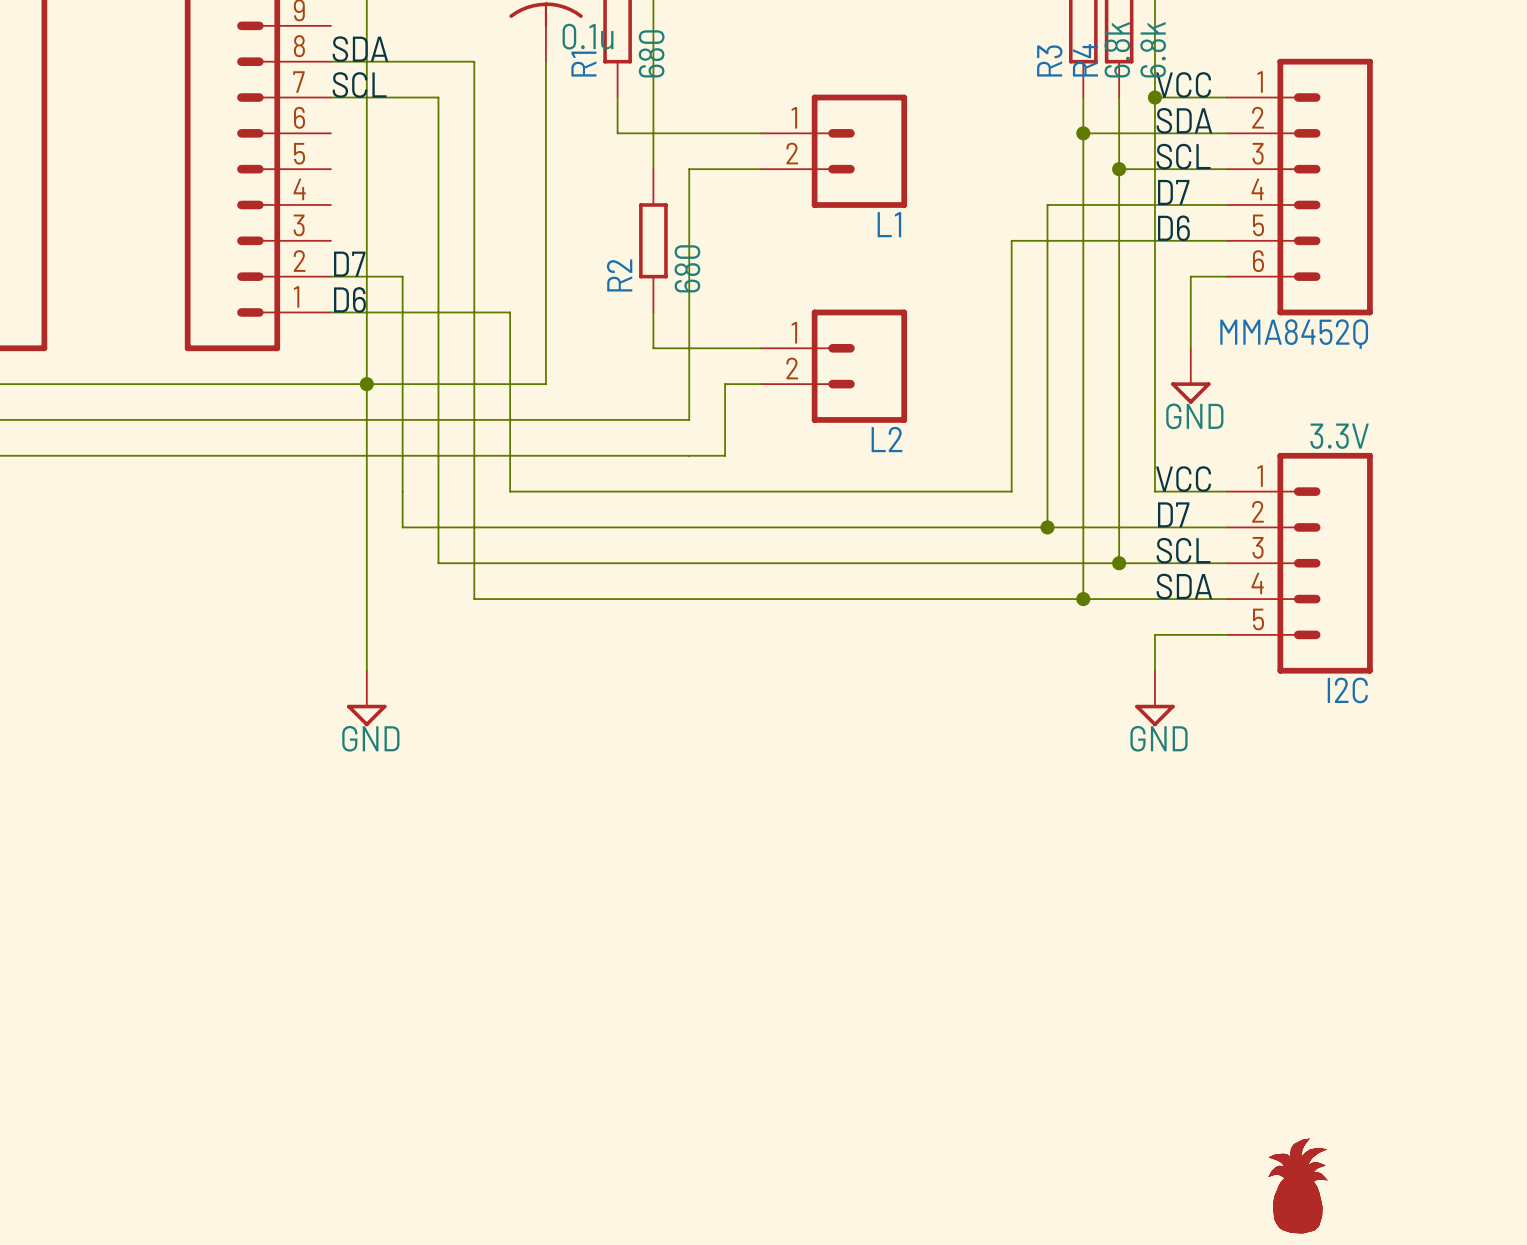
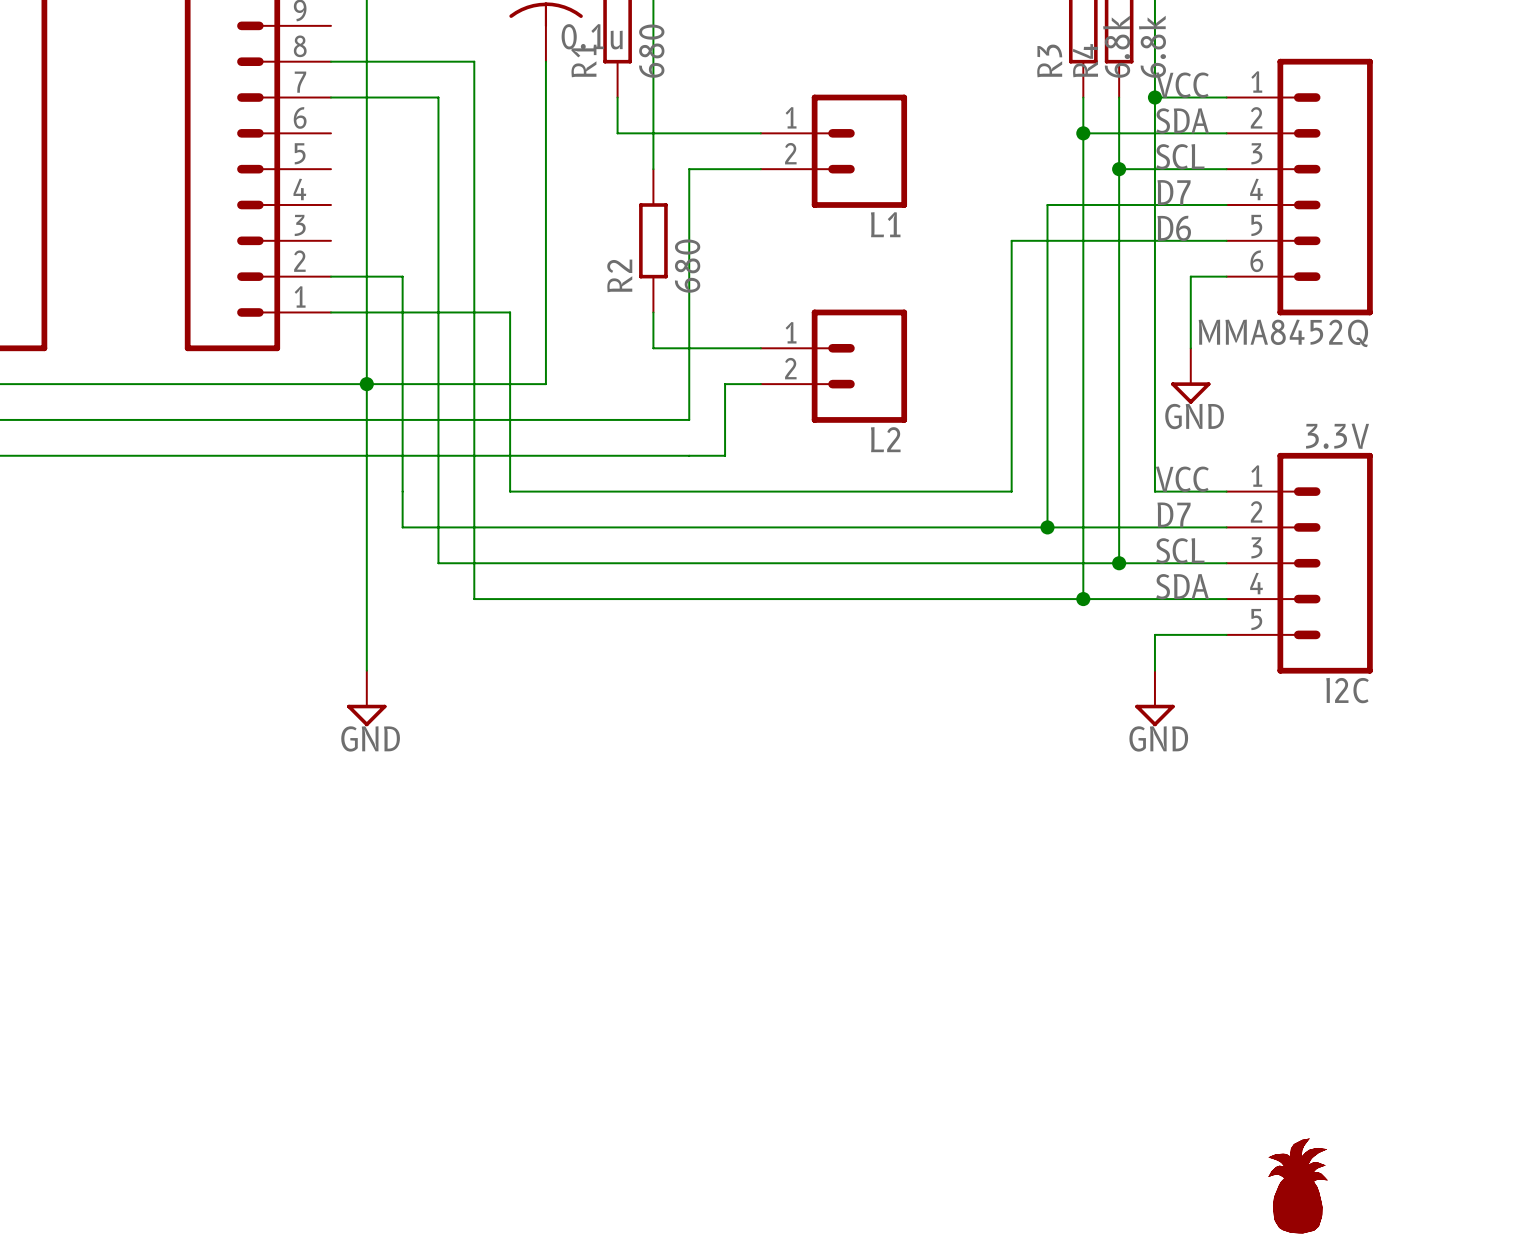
label: SDA (360, 49) -> none
label: SCL (359, 85) -> none
label: D7 (349, 264) -> none
label: D6 (349, 299) -> none

